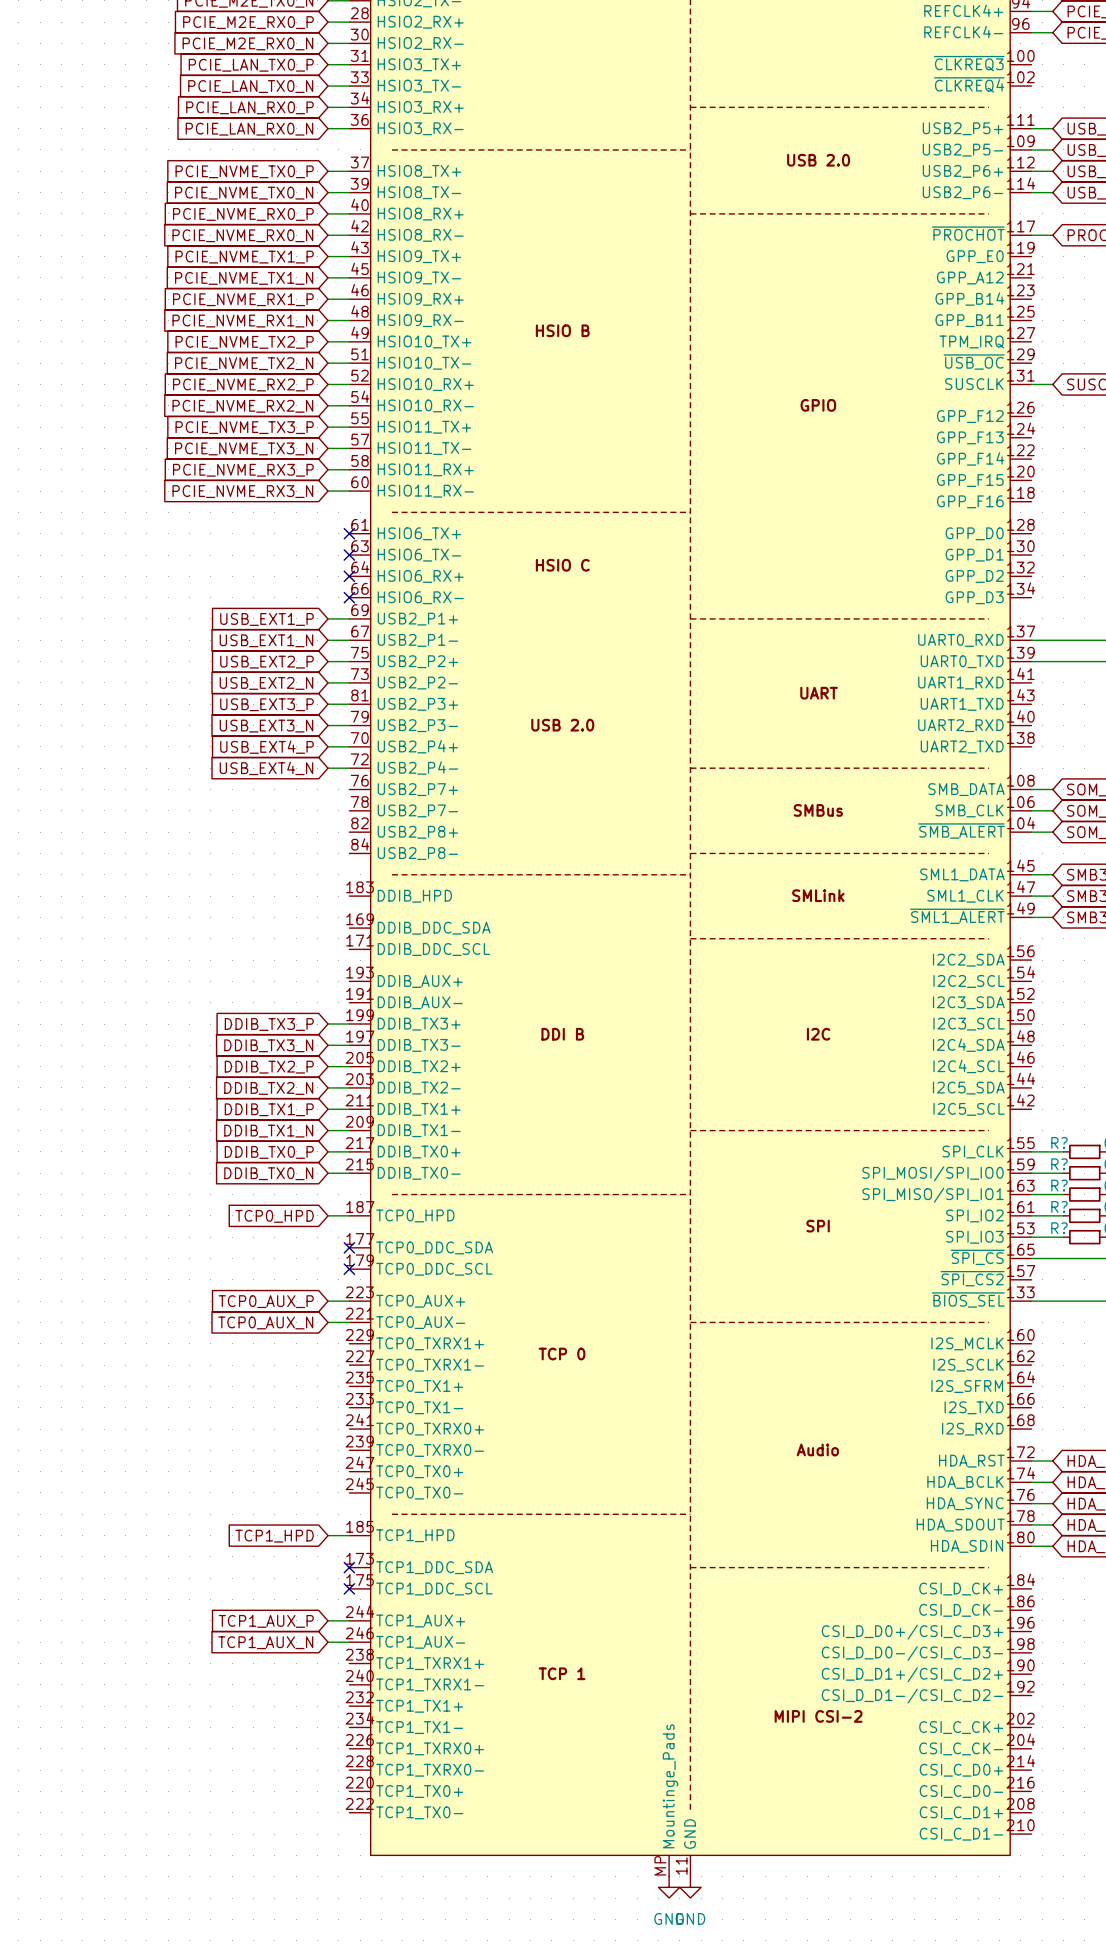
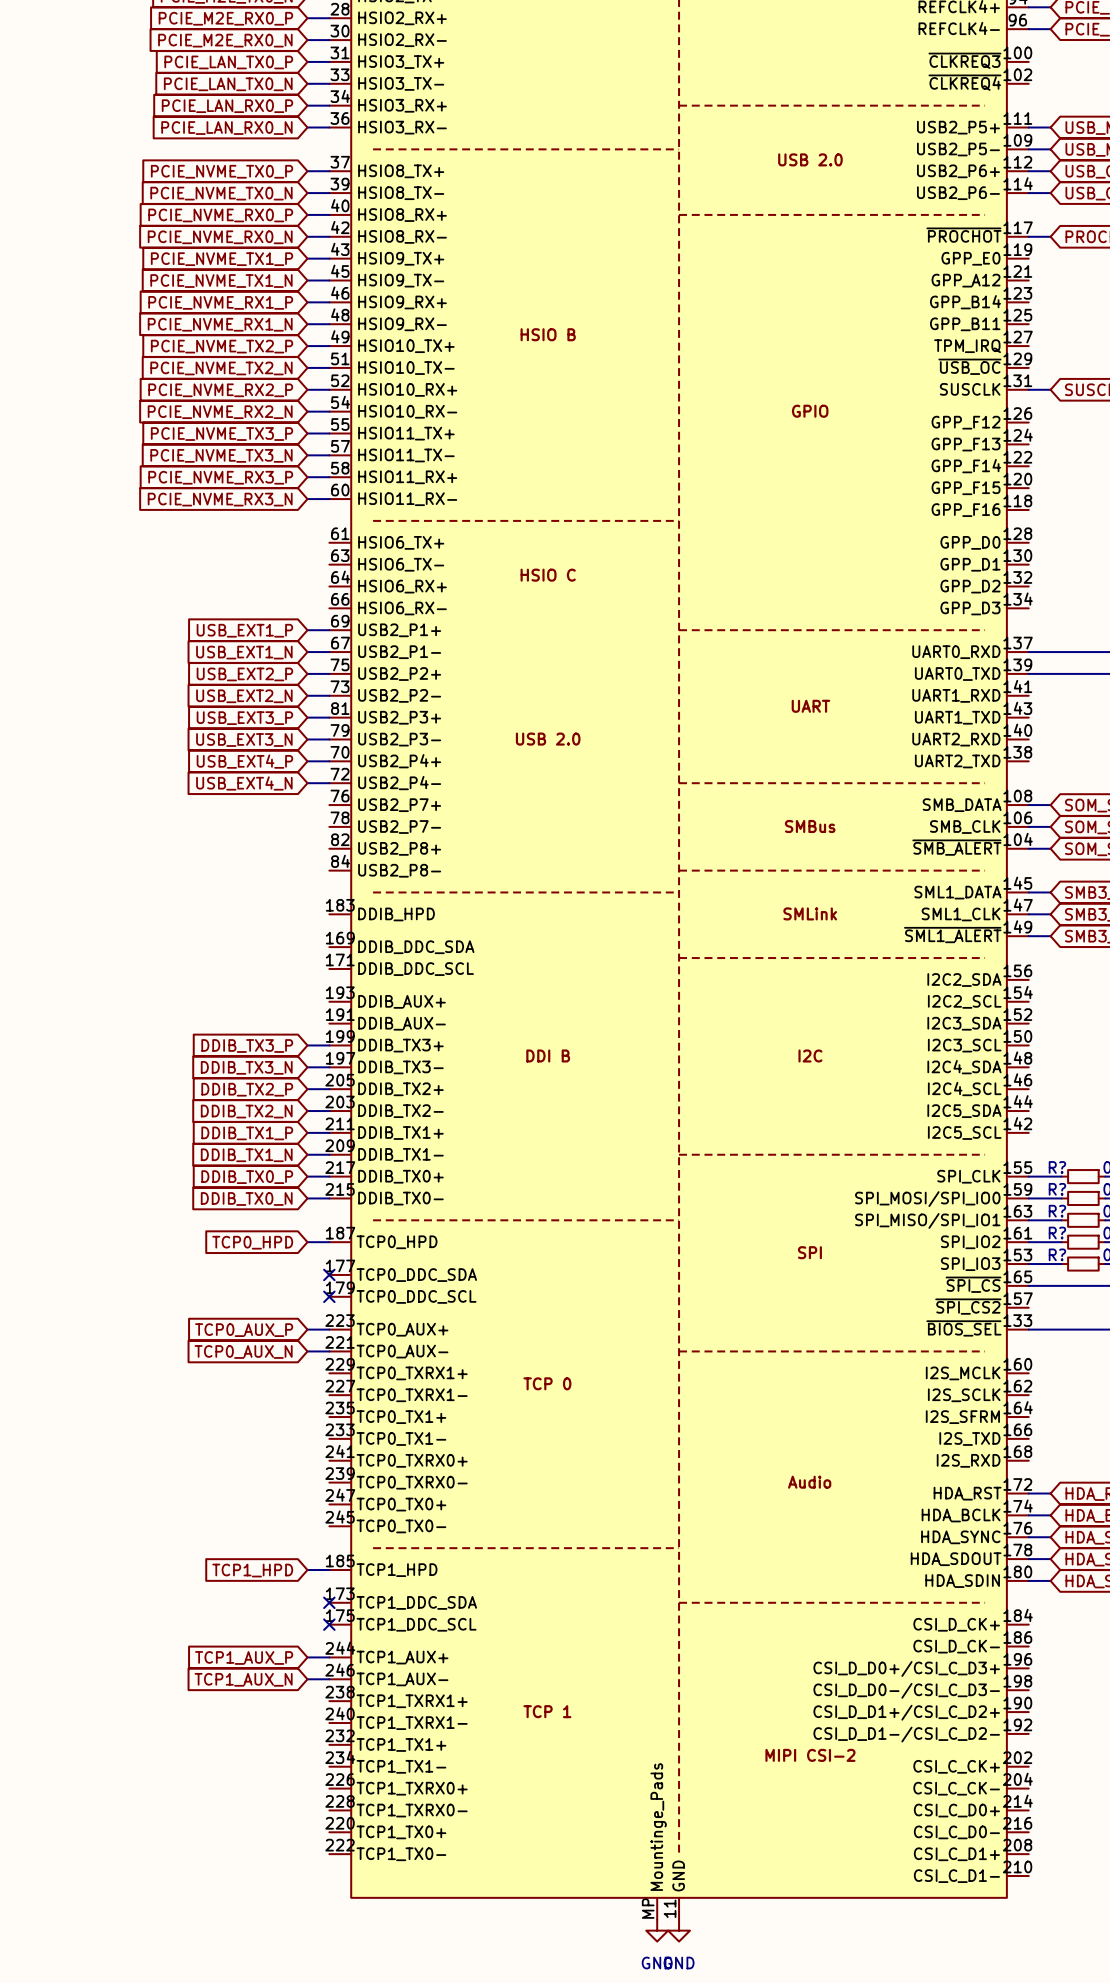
no-connect mark: (349, 533) -> none
no-connect mark: (349, 555) -> none
no-connect mark: (349, 576) -> none
no-connect mark: (349, 597) -> none

